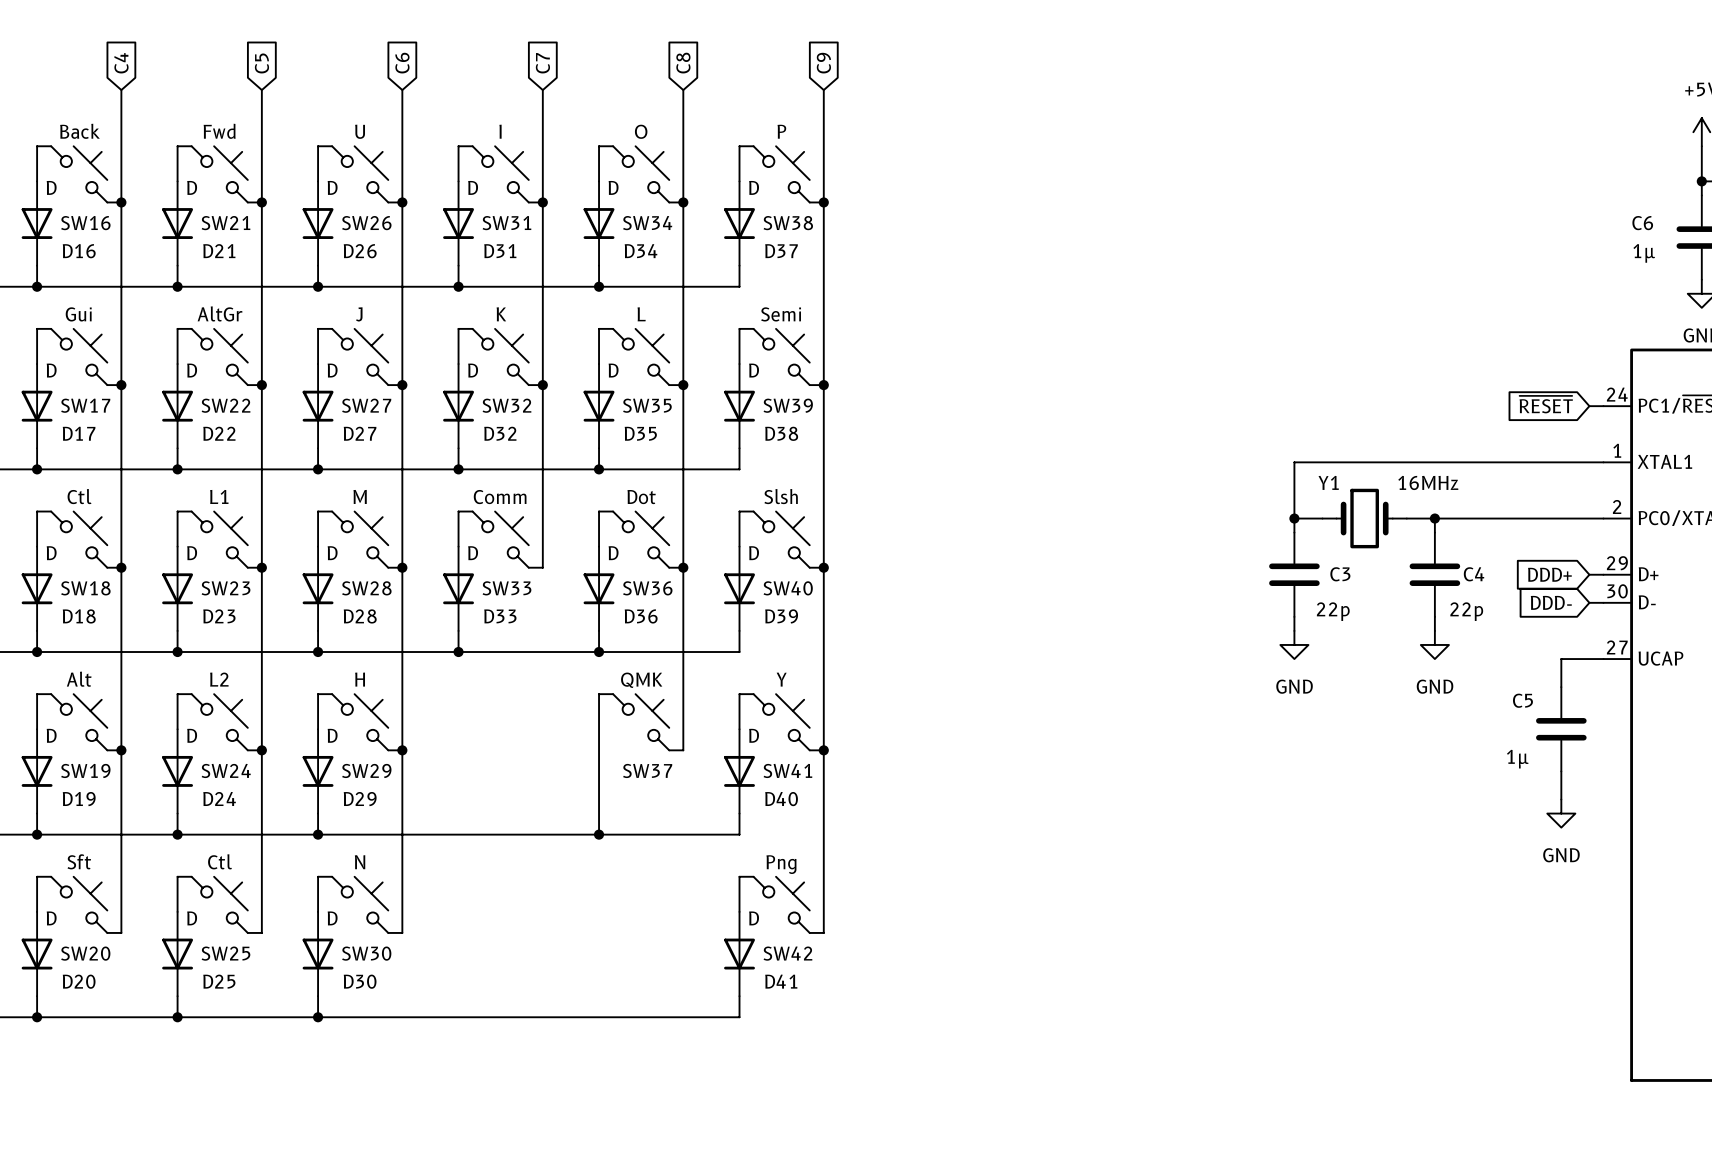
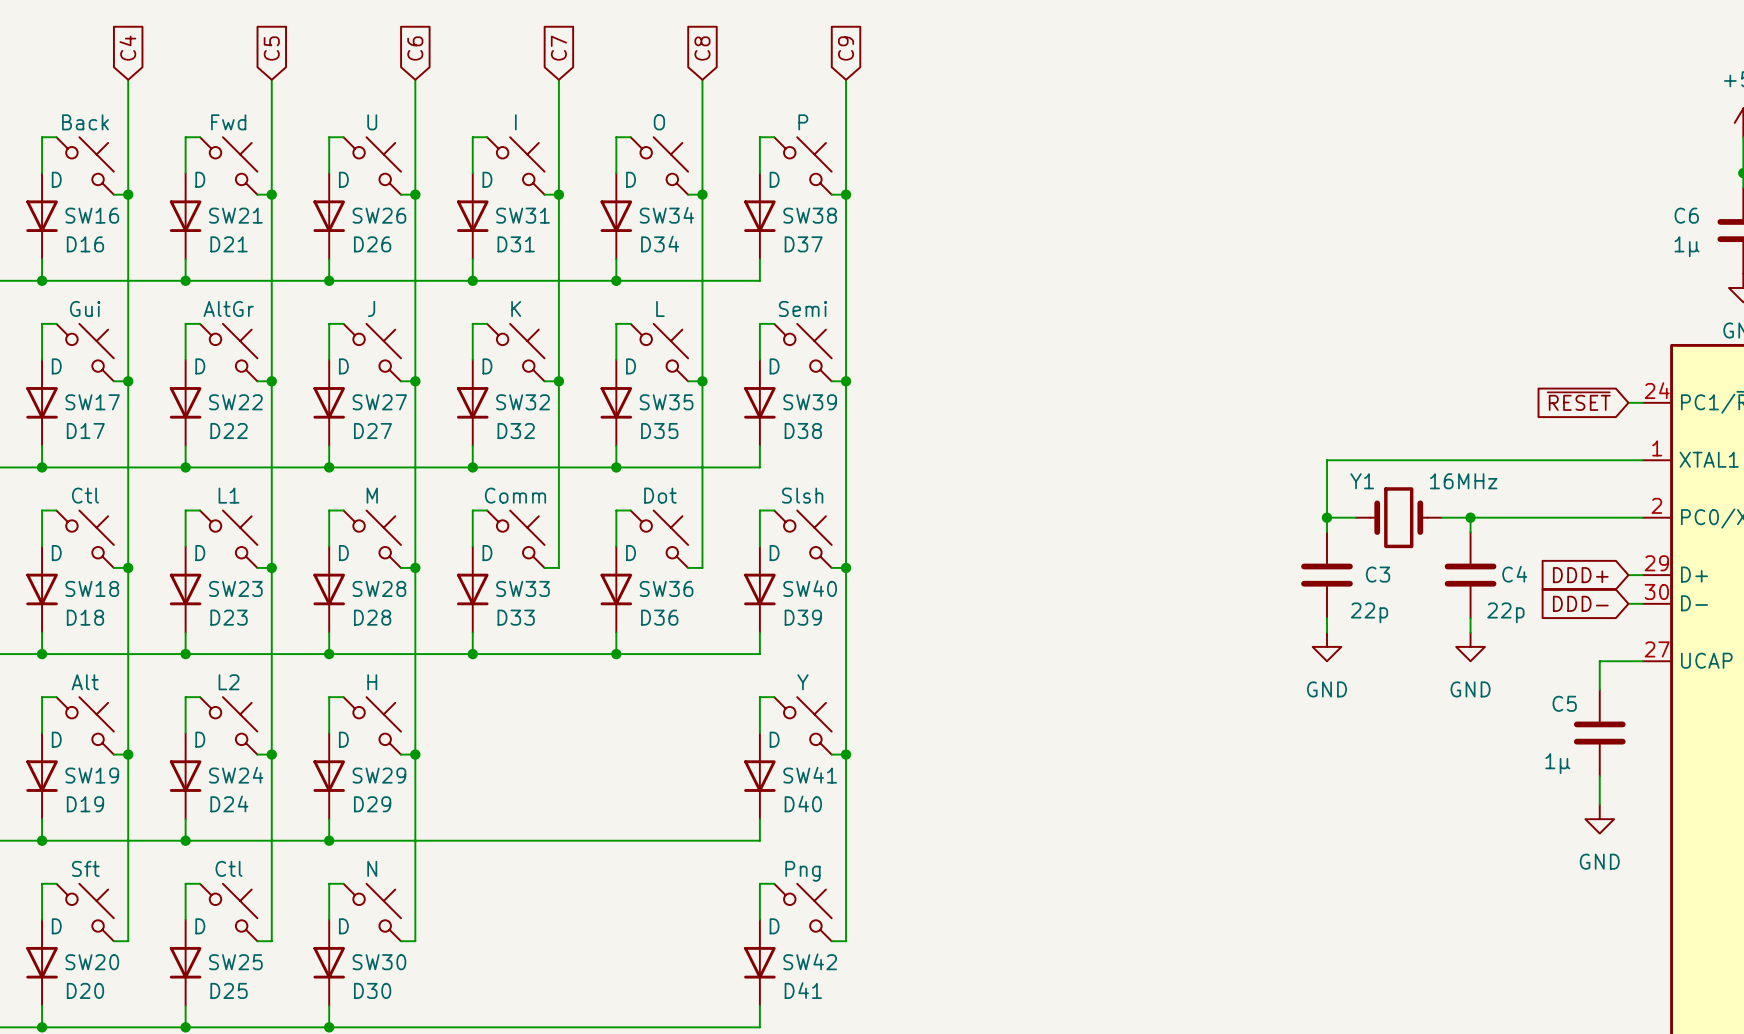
wire: (683, 567) (683, 750) (669, 750) -> none
junction: (683, 567) -> none
wire: (613, 694) (599, 694) (599, 834) -> none
SW37: QMK (641, 722) -> none
junction: (599, 834) -> none

